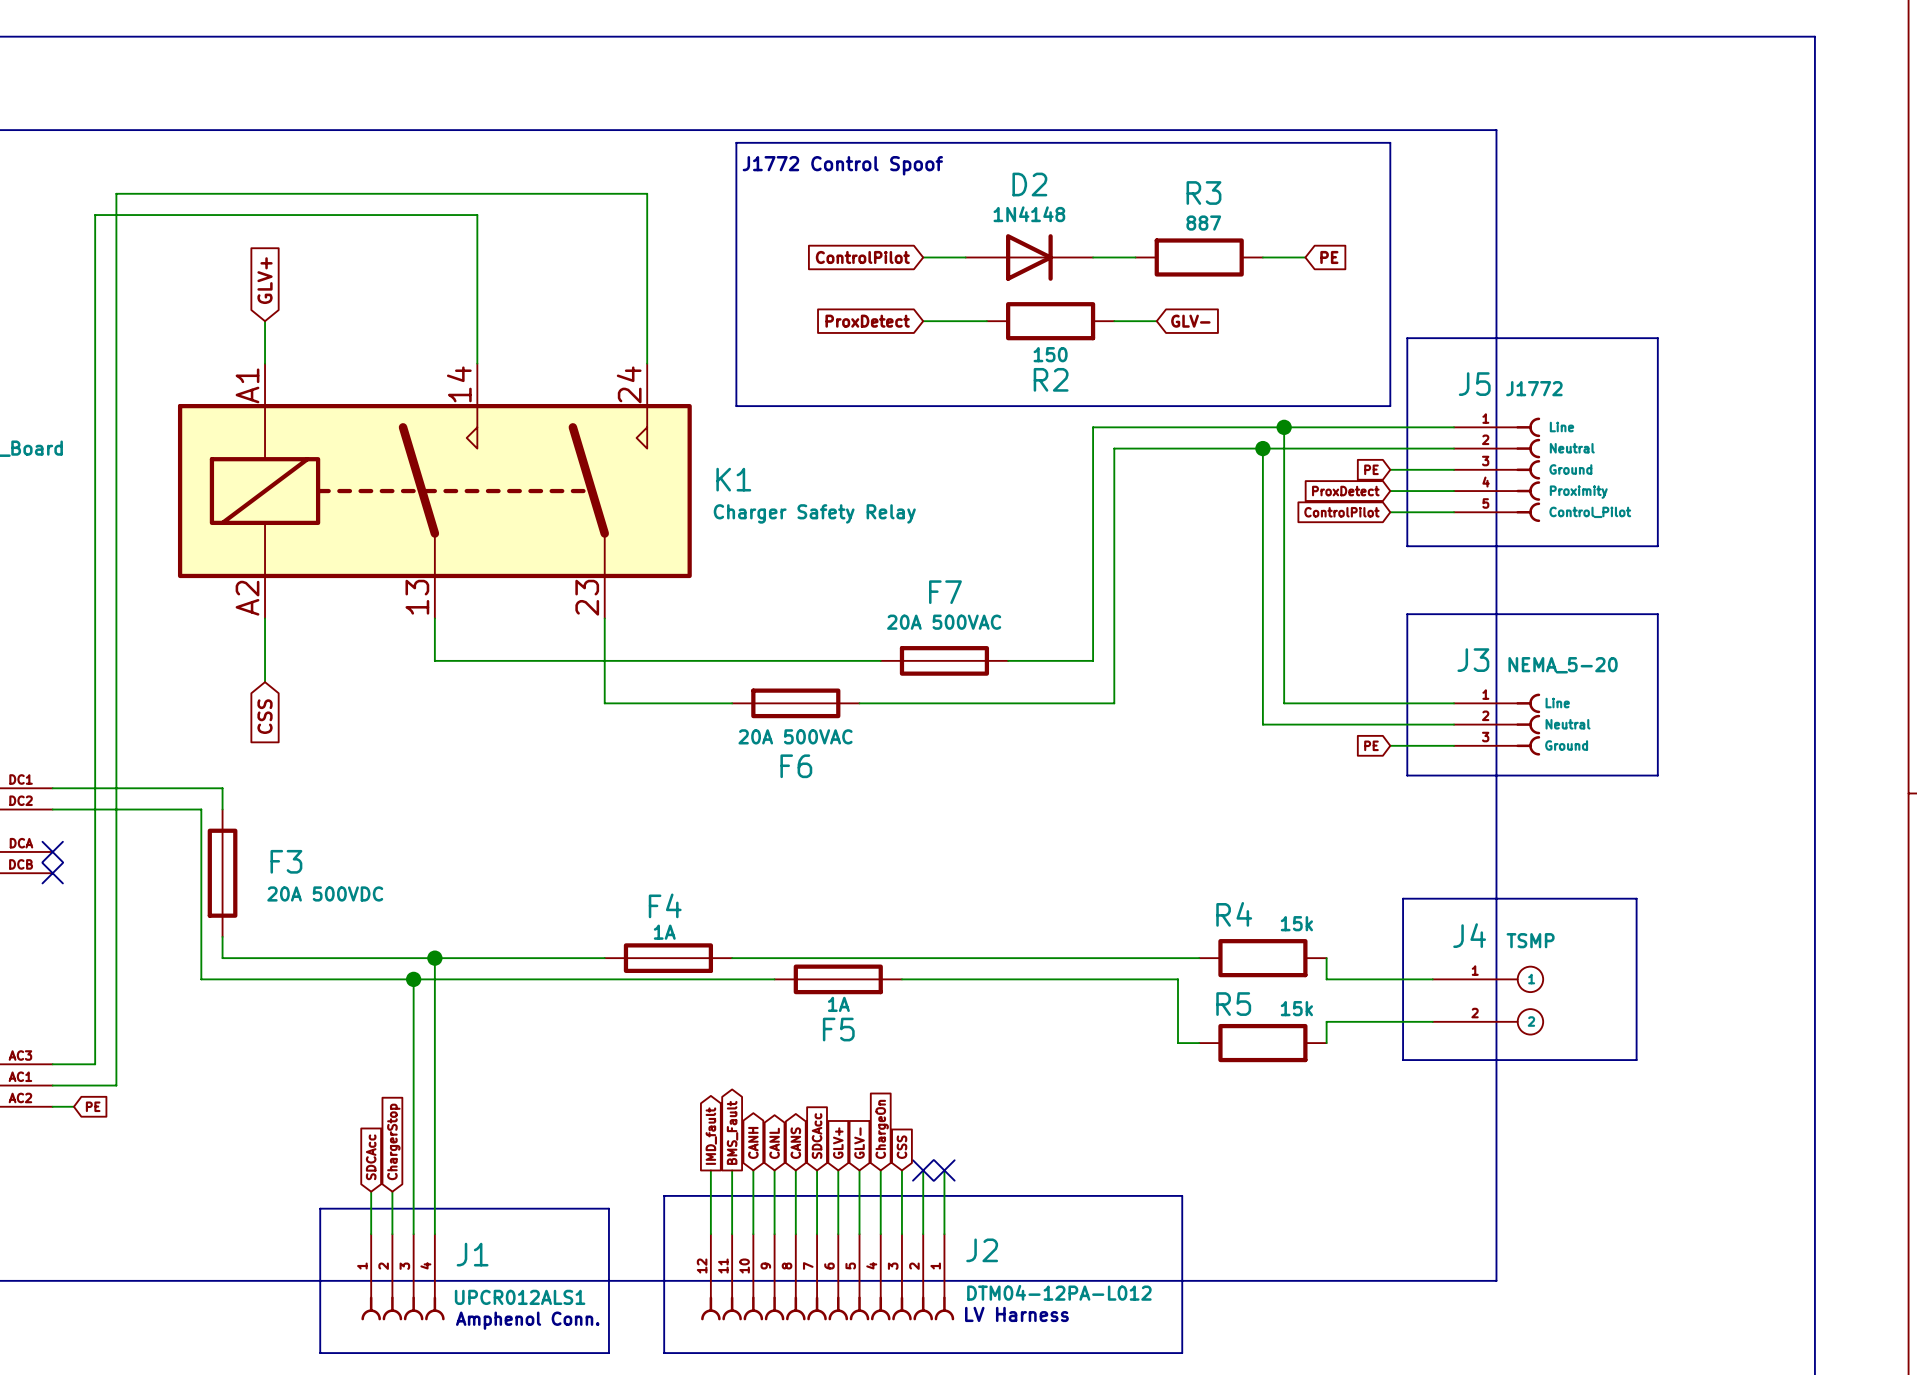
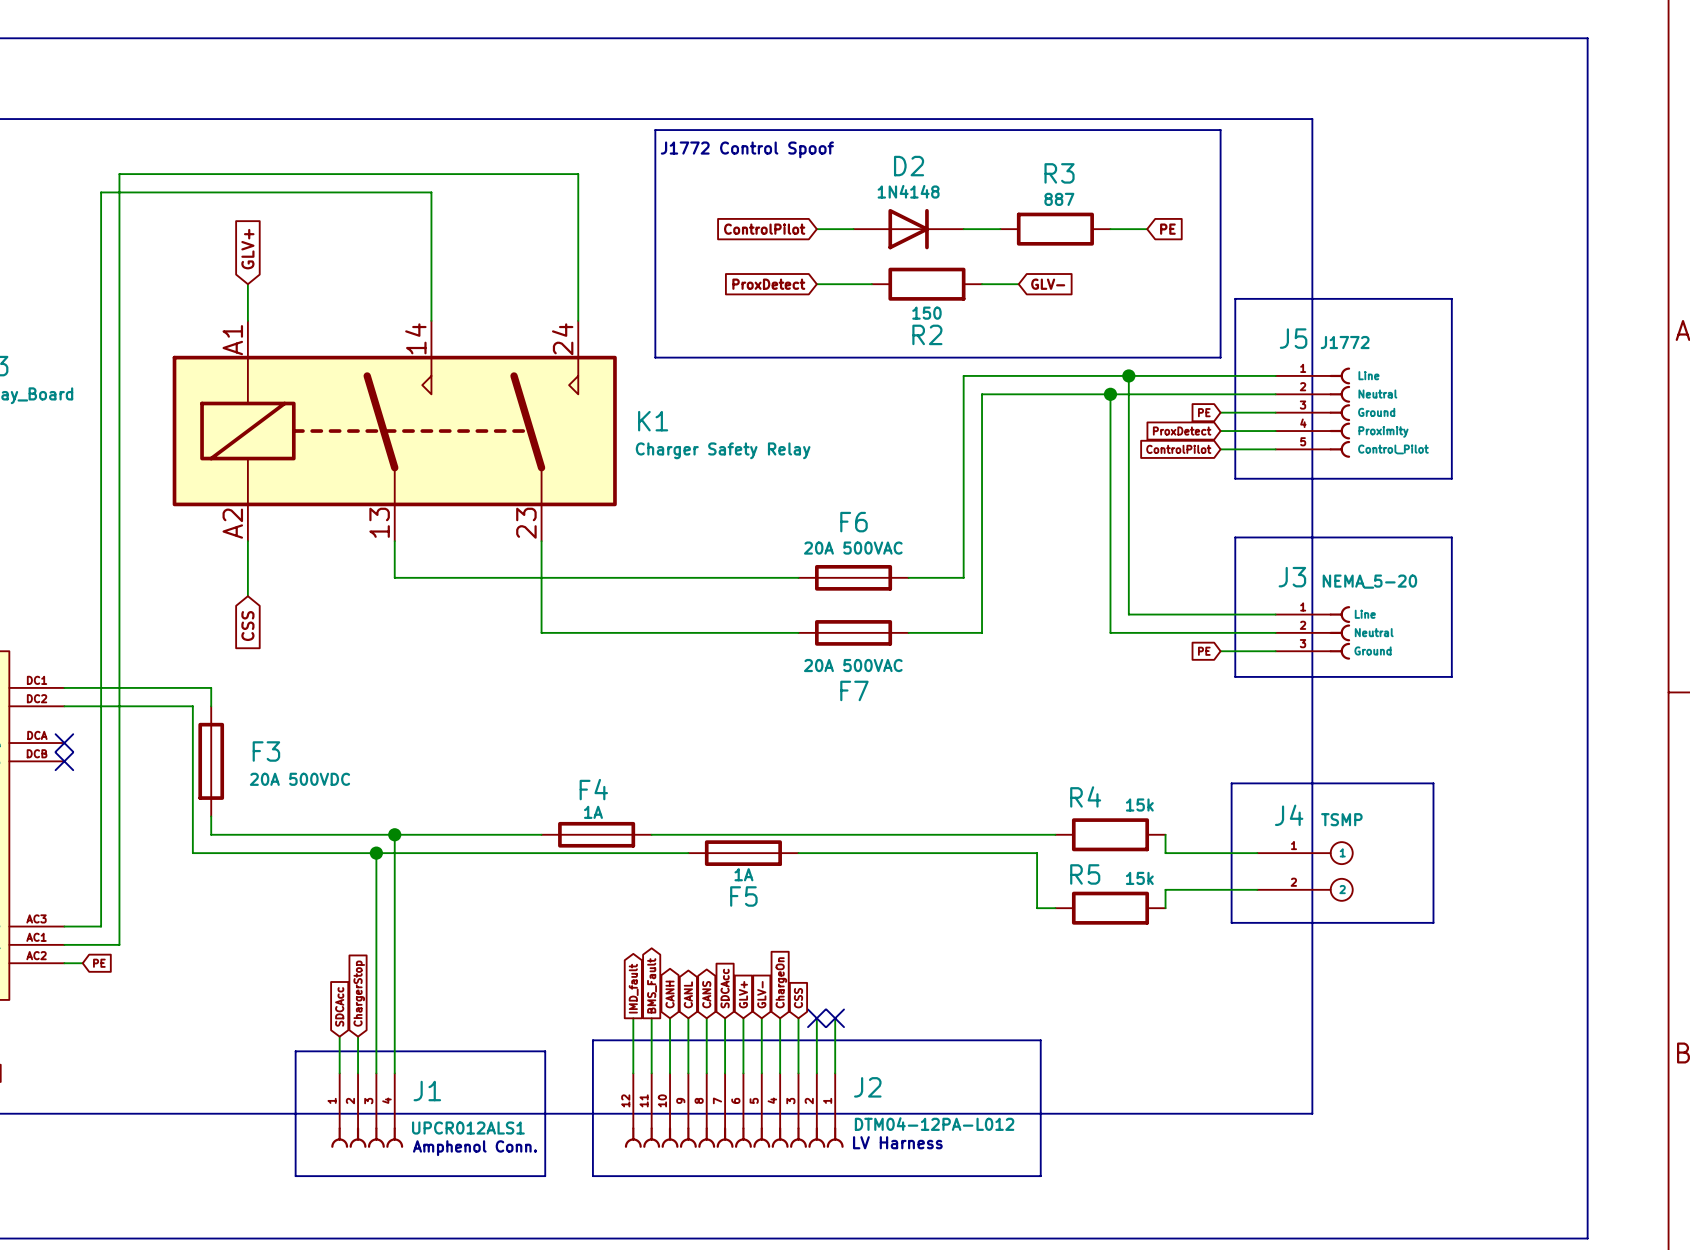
F7 name position: F7 (945, 592) -> F7 (854, 690)
F7 value position: 20A 500VAC (944, 622) -> 20A 500VAC (853, 665)
F7 position: (944, 660) -> (853, 632)
wire: (604, 703) (732, 703) -> (541, 614) (541, 632) (798, 632)
F6 position: (795, 703) -> (853, 577)
wire: (859, 703) (1114, 703) -> (908, 632) (982, 632) (982, 614)
F6 value position: 20A 500VAC (795, 736) -> 20A 500VAC (853, 548)
F6 name position: F6 (796, 766) -> F6 (853, 522)

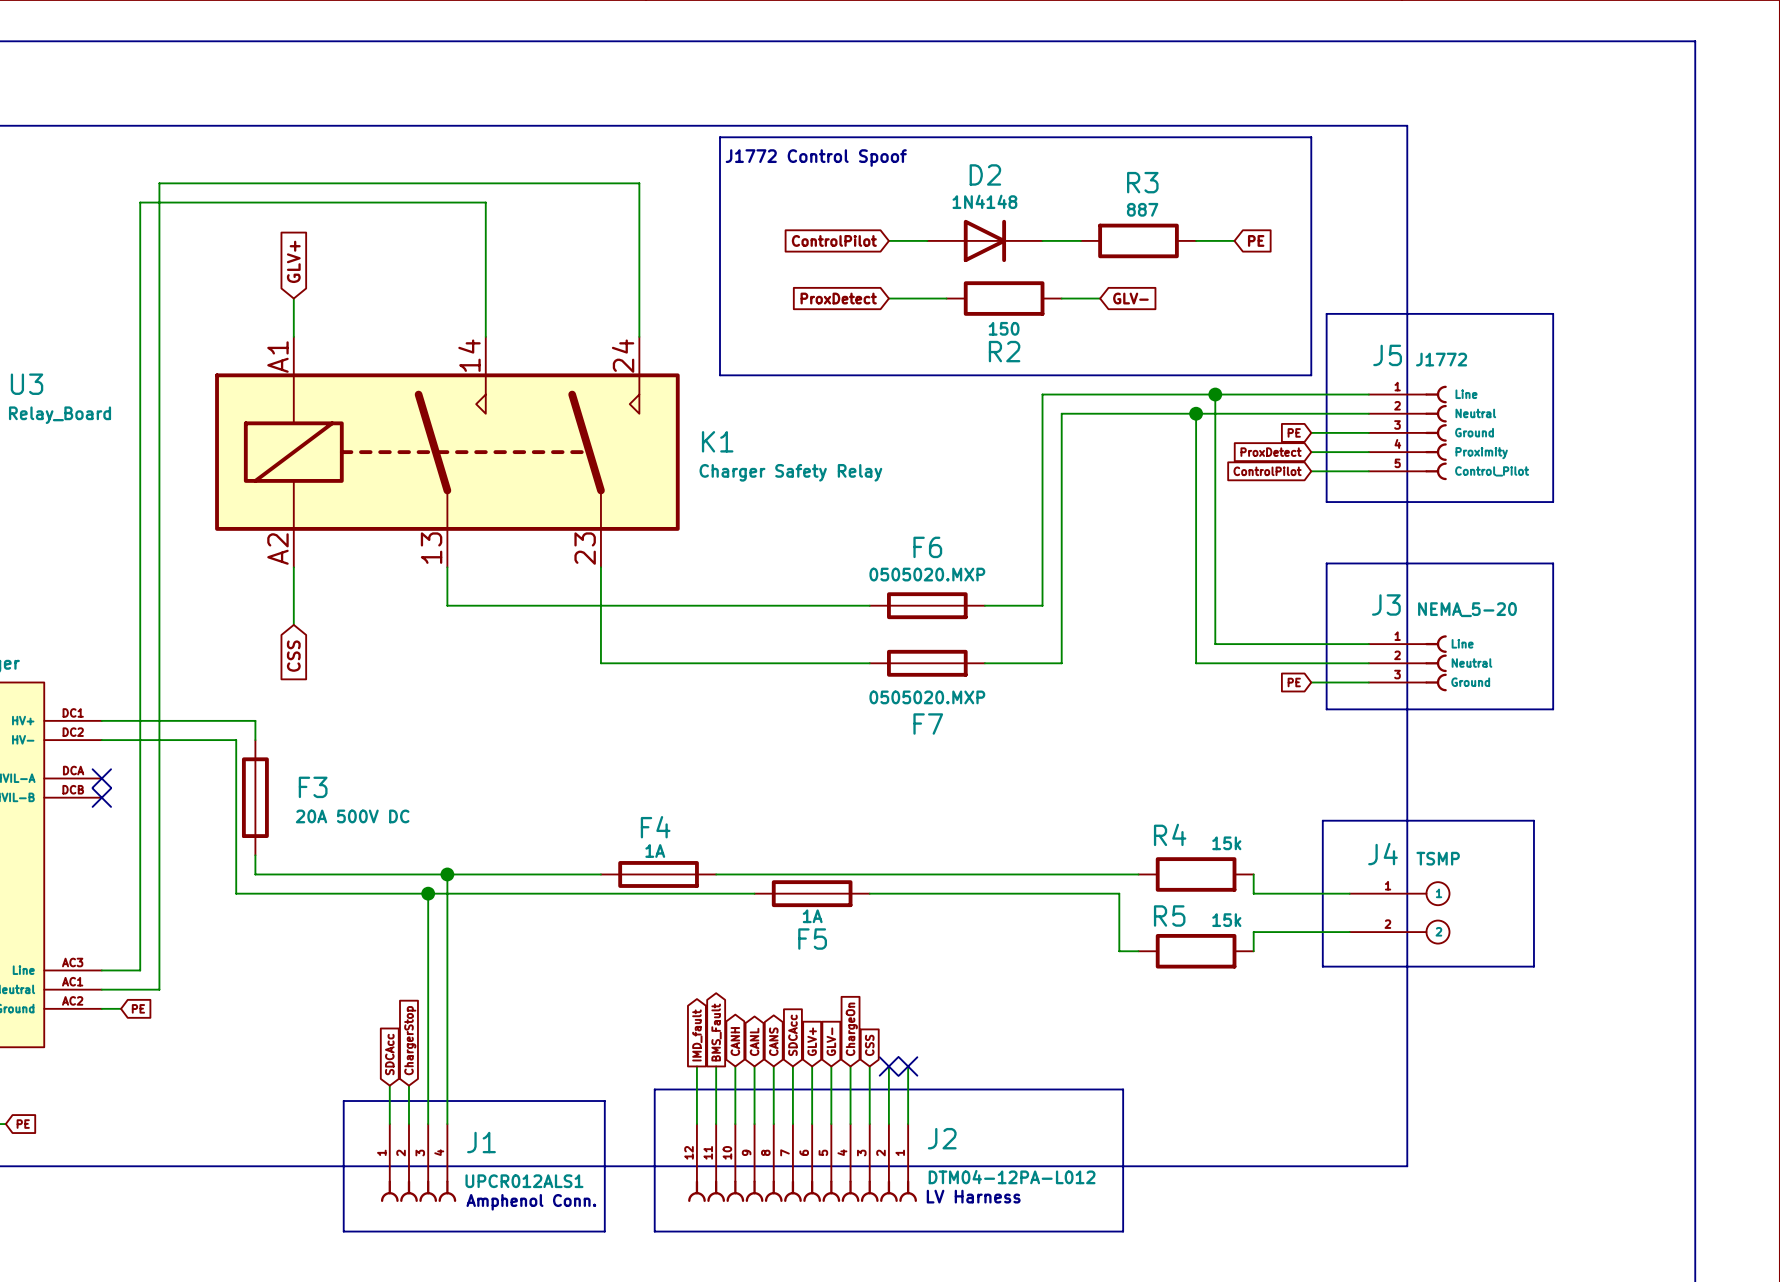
F6 value: 20A 500VAC (853, 548) -> 0505020.MXP (927, 574)
F7 value: 20A 500VAC (853, 665) -> 0505020.MXP (927, 697)
F3 value: 20A 500VDC (299, 779) -> 20A 500V DC (352, 816)

